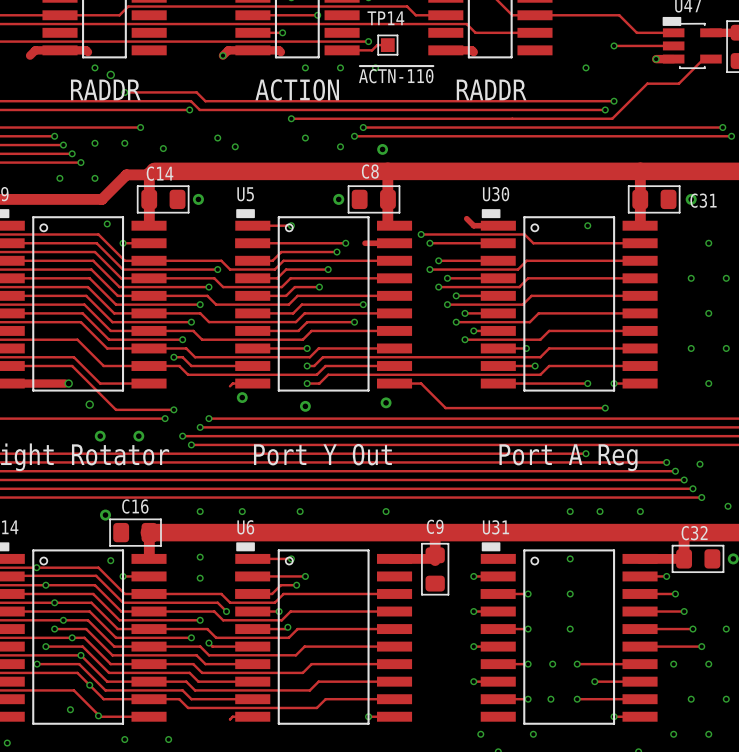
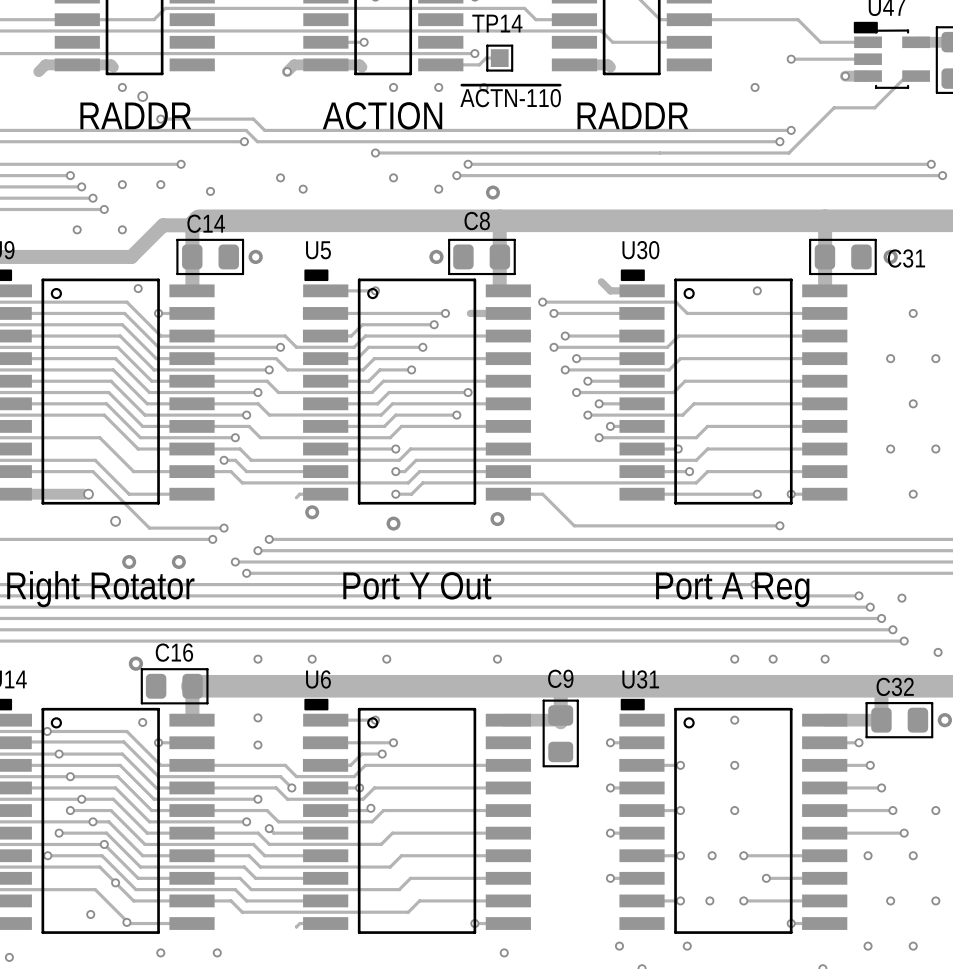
track: (252, 15) (317, 15) -> none
via: (317, 15) -> none
via: none -> (504, 952)

